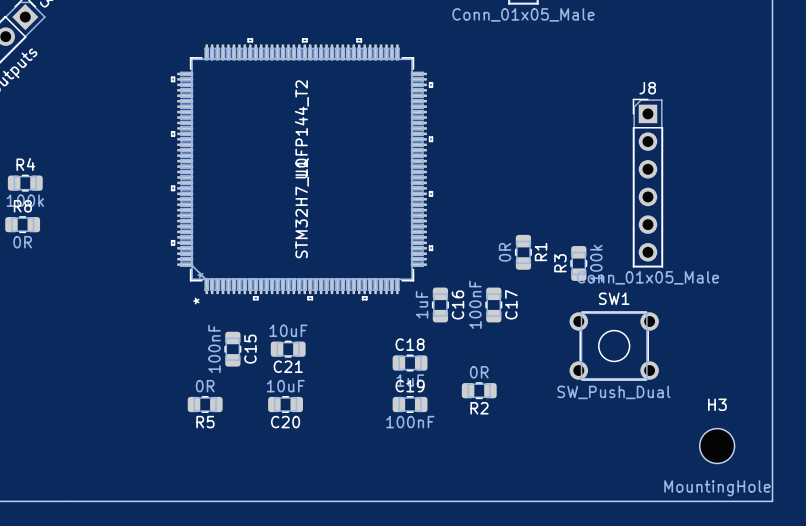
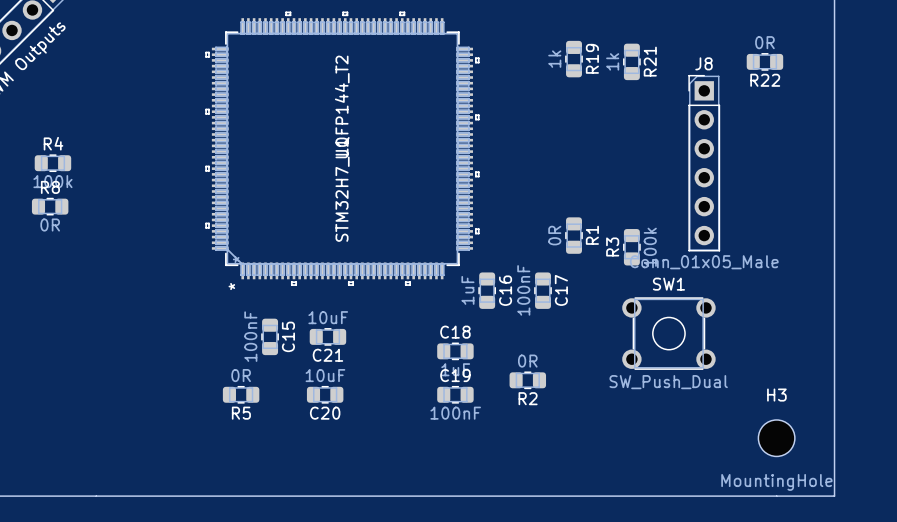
R19: none -> 1k (574, 59)
R21: none -> 1k (631, 61)
R22: none -> 0R (764, 61)

